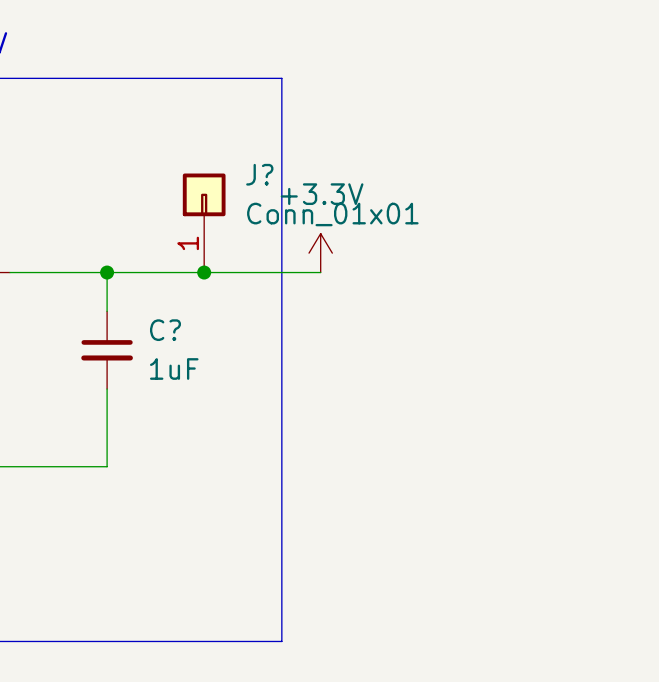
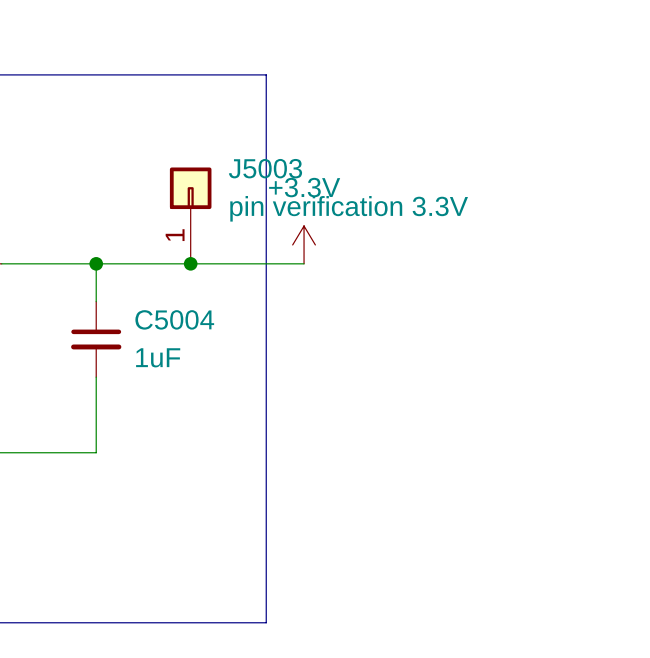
J? name: J? (259, 174) -> J5003 (265, 168)
J? value: Conn_01x01 (332, 214) -> pin verification 3.3V (349, 208)
C? name: C? (165, 330) -> C5004 (174, 319)

